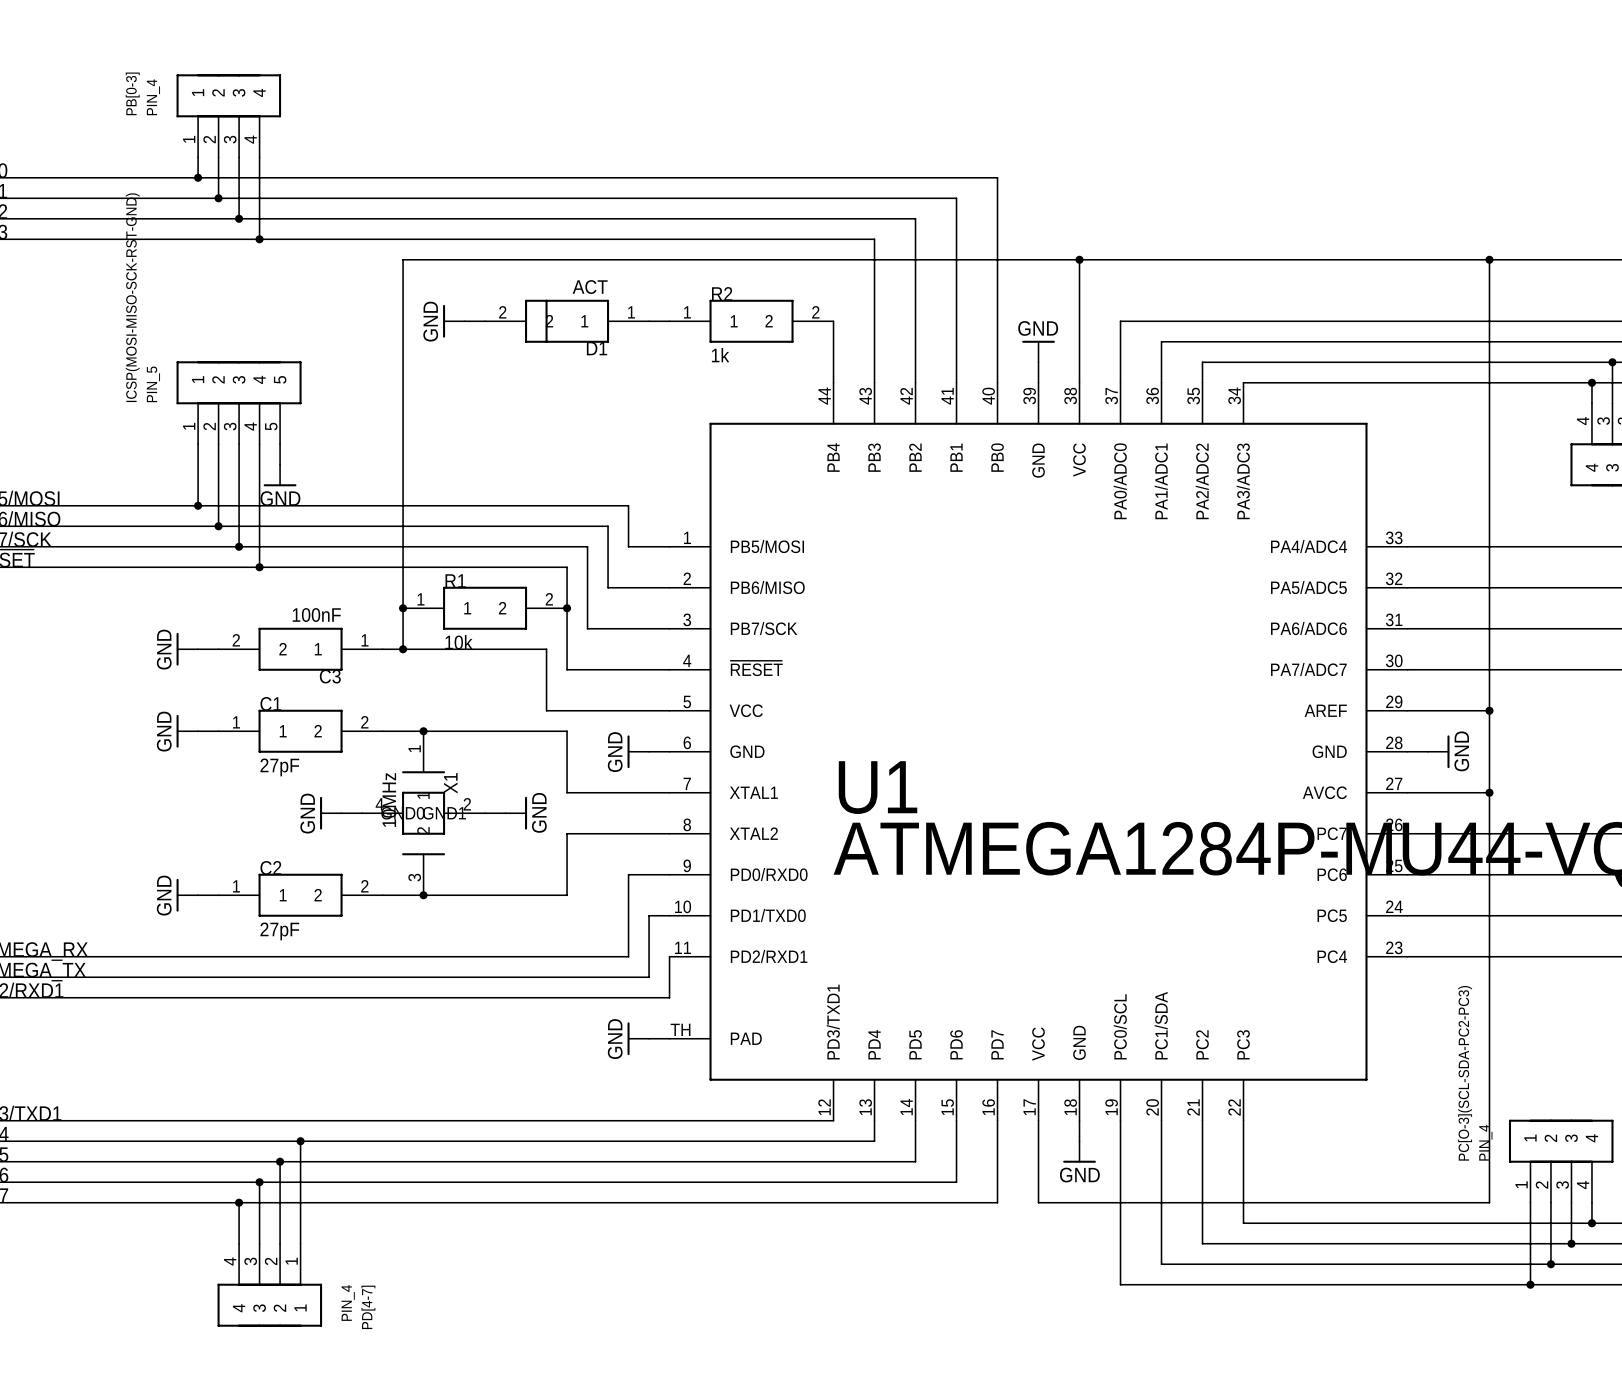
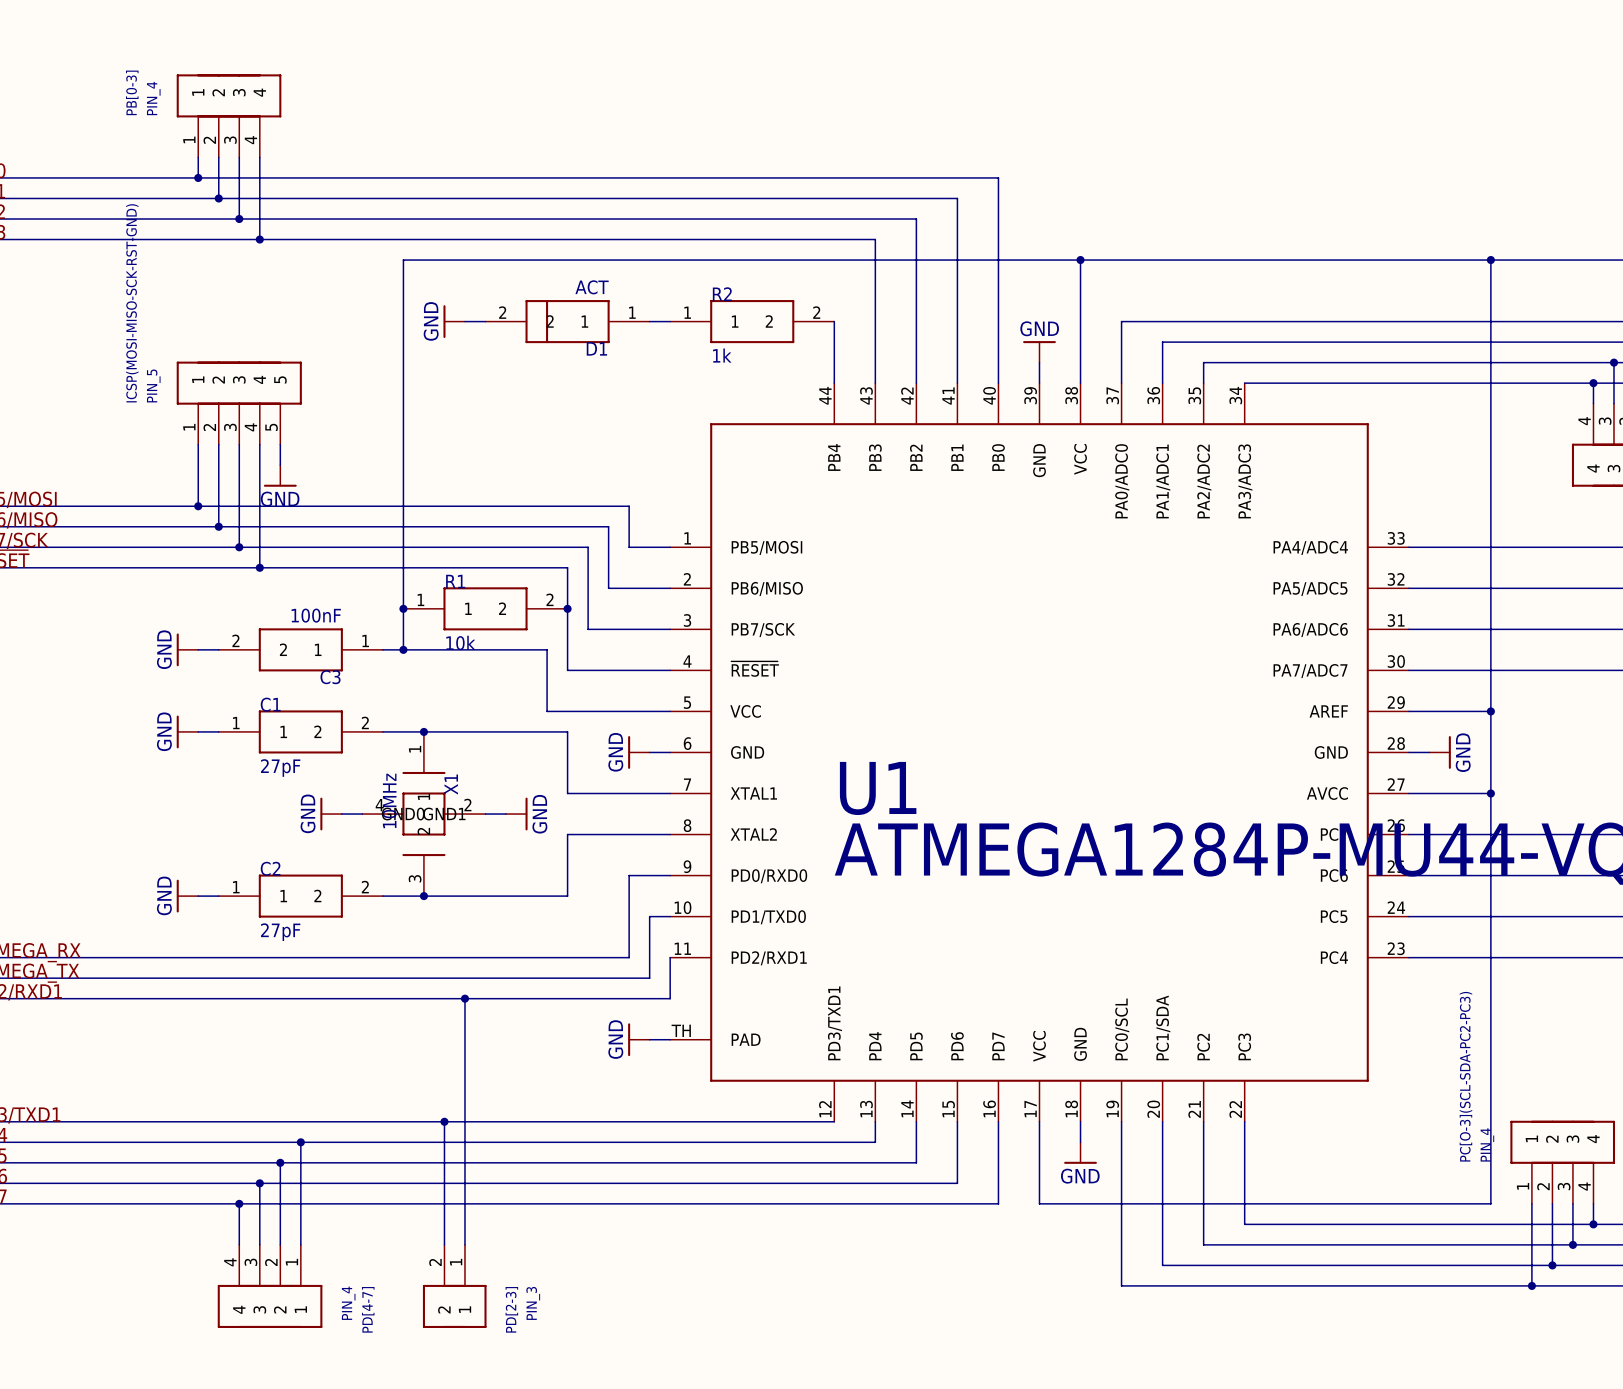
wire: none -> (464, 998) (464, 1244)
junction: none -> (464, 998)
wire: none -> (444, 1121) (444, 1244)
junction: none -> (444, 1121)
PIN_3: none -> PD[2-3] (454, 1286)

